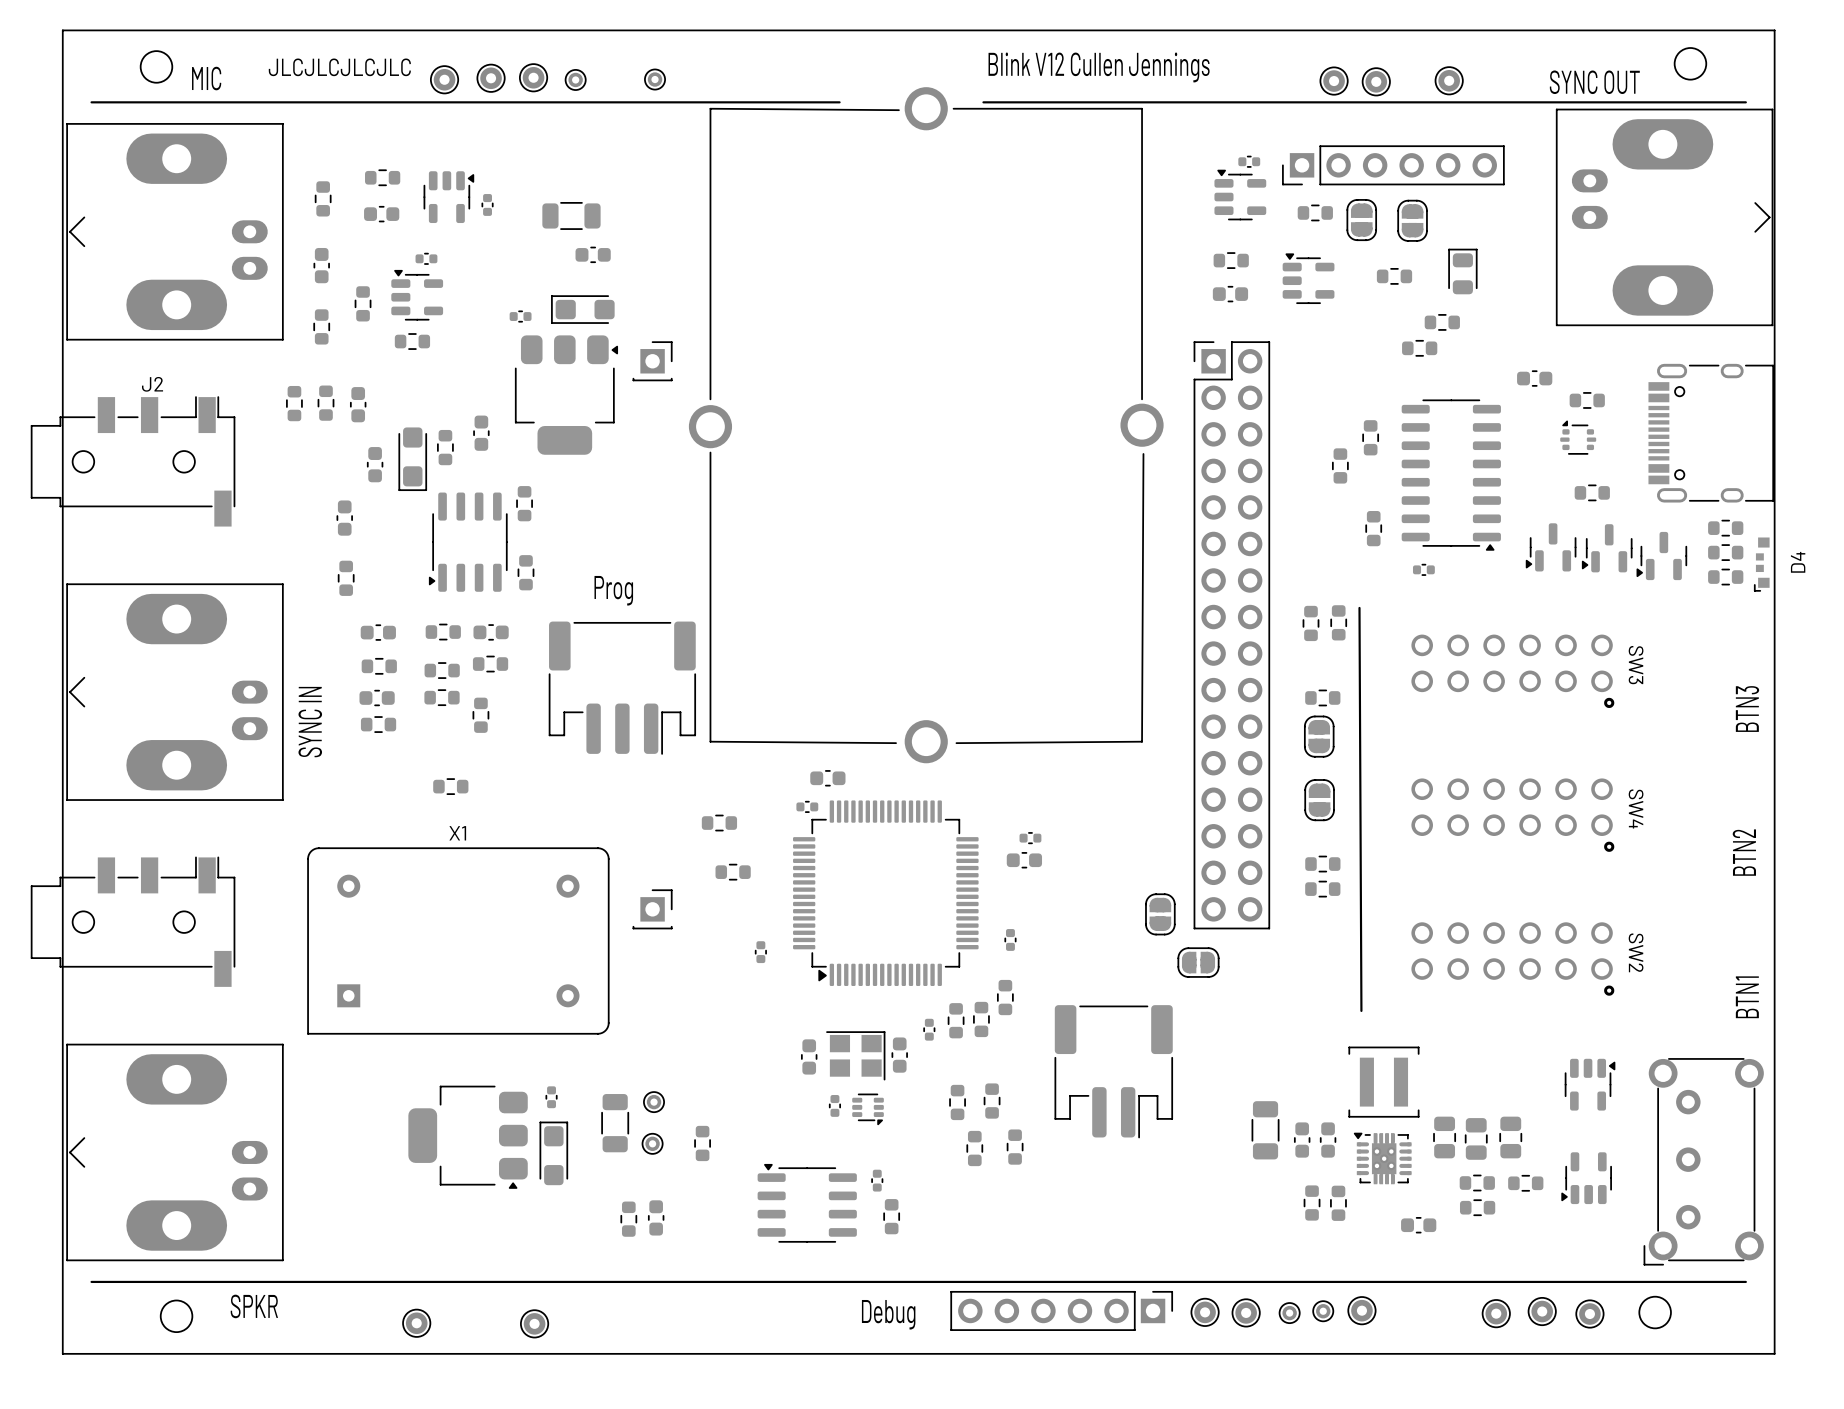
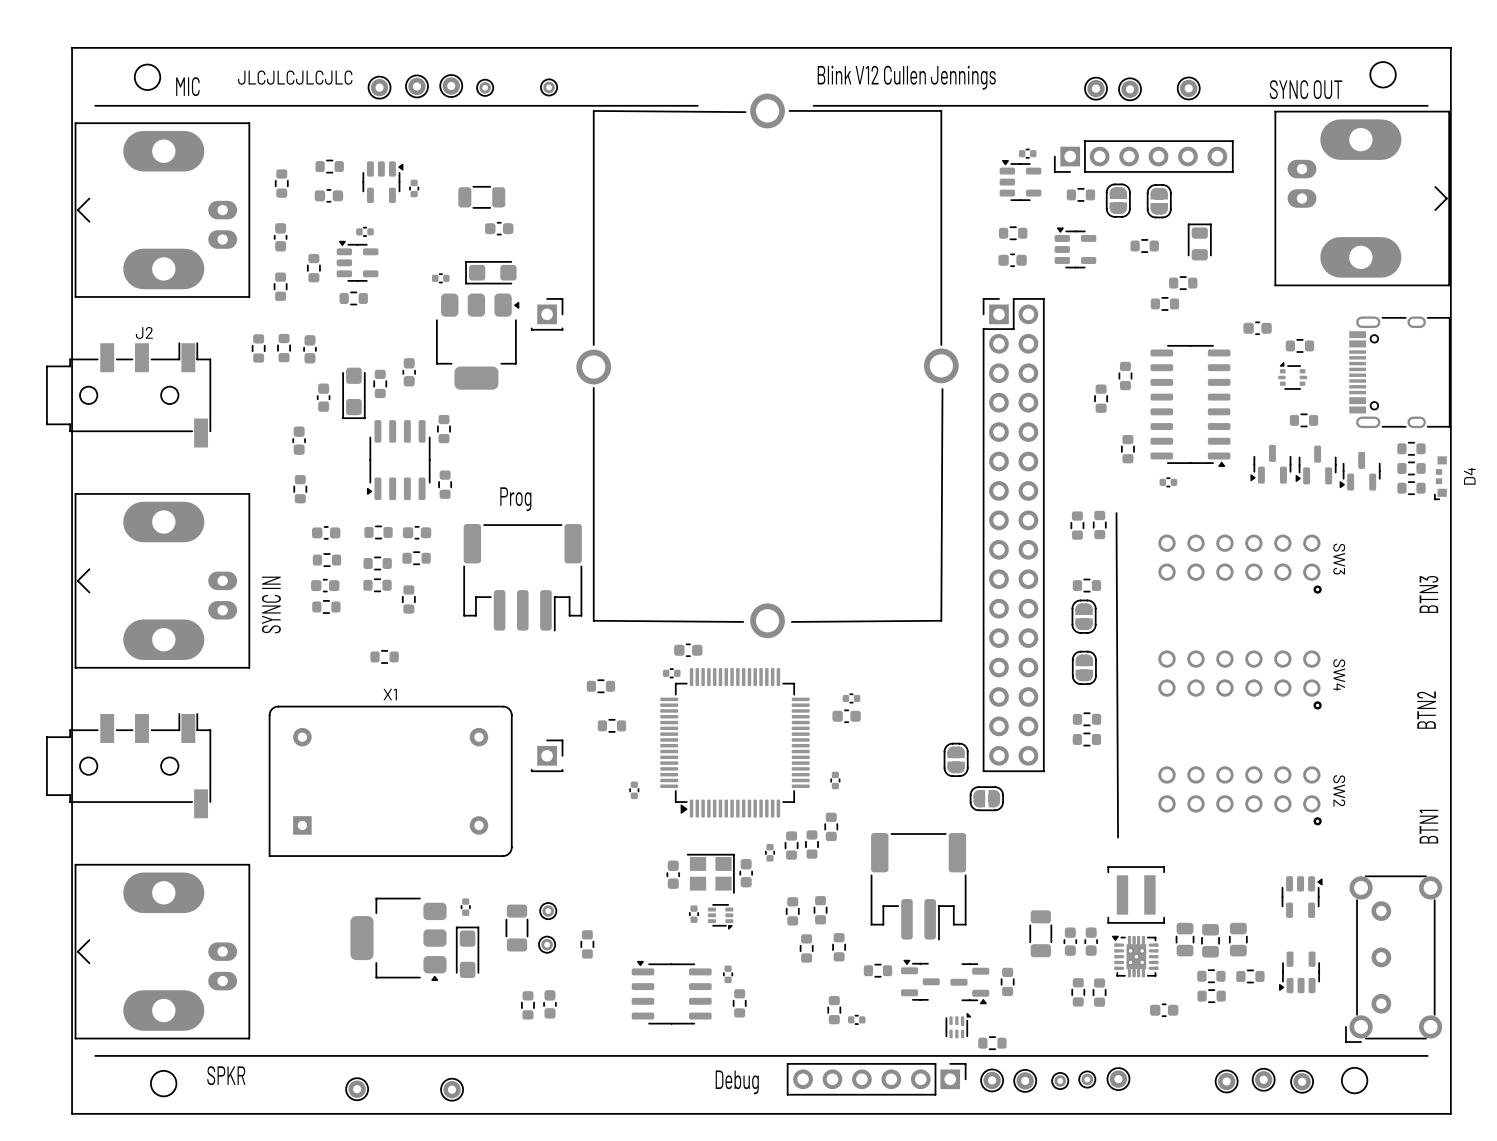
part: none -> (877, 970)
part: none -> (920, 980)
part: none -> (1007, 981)
part: none -> (969, 983)
part: none -> (834, 1010)
part: none -> (856, 1019)
part: none -> (958, 1025)
part: none -> (992, 1043)

